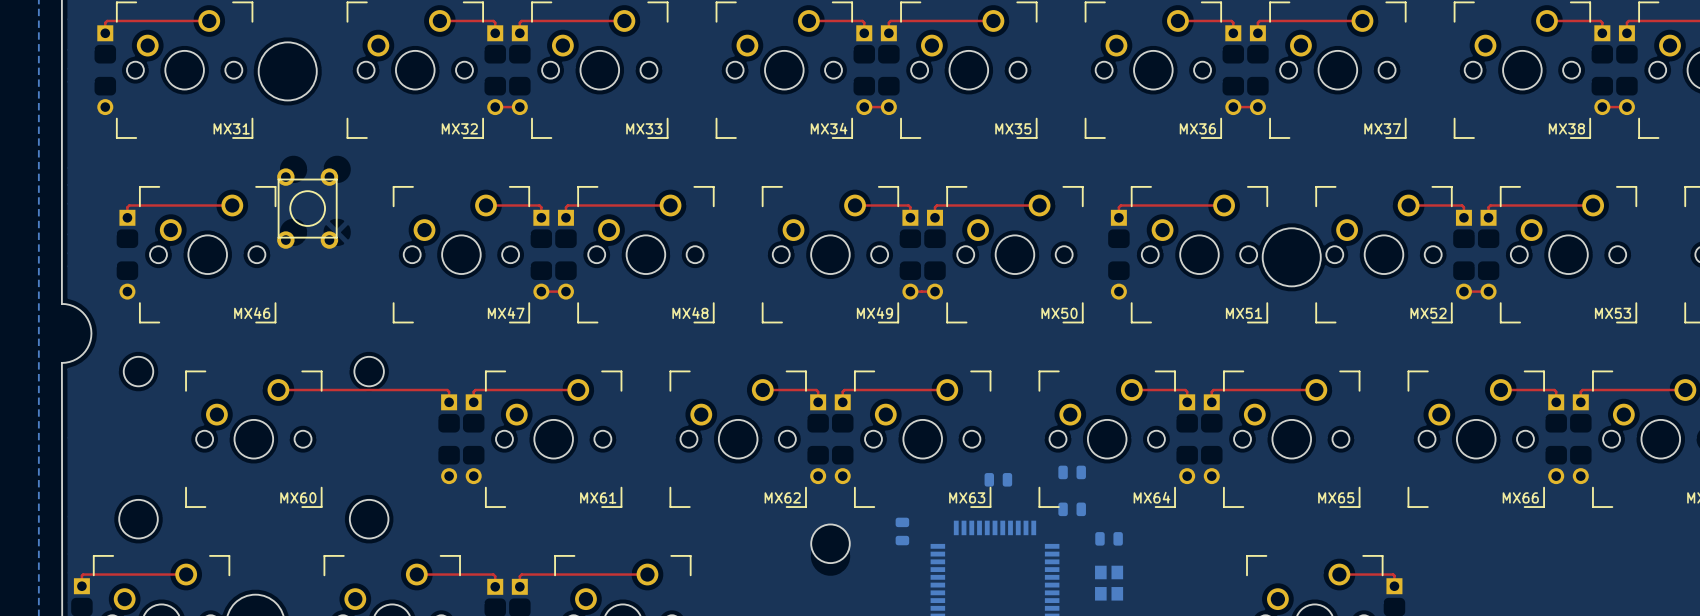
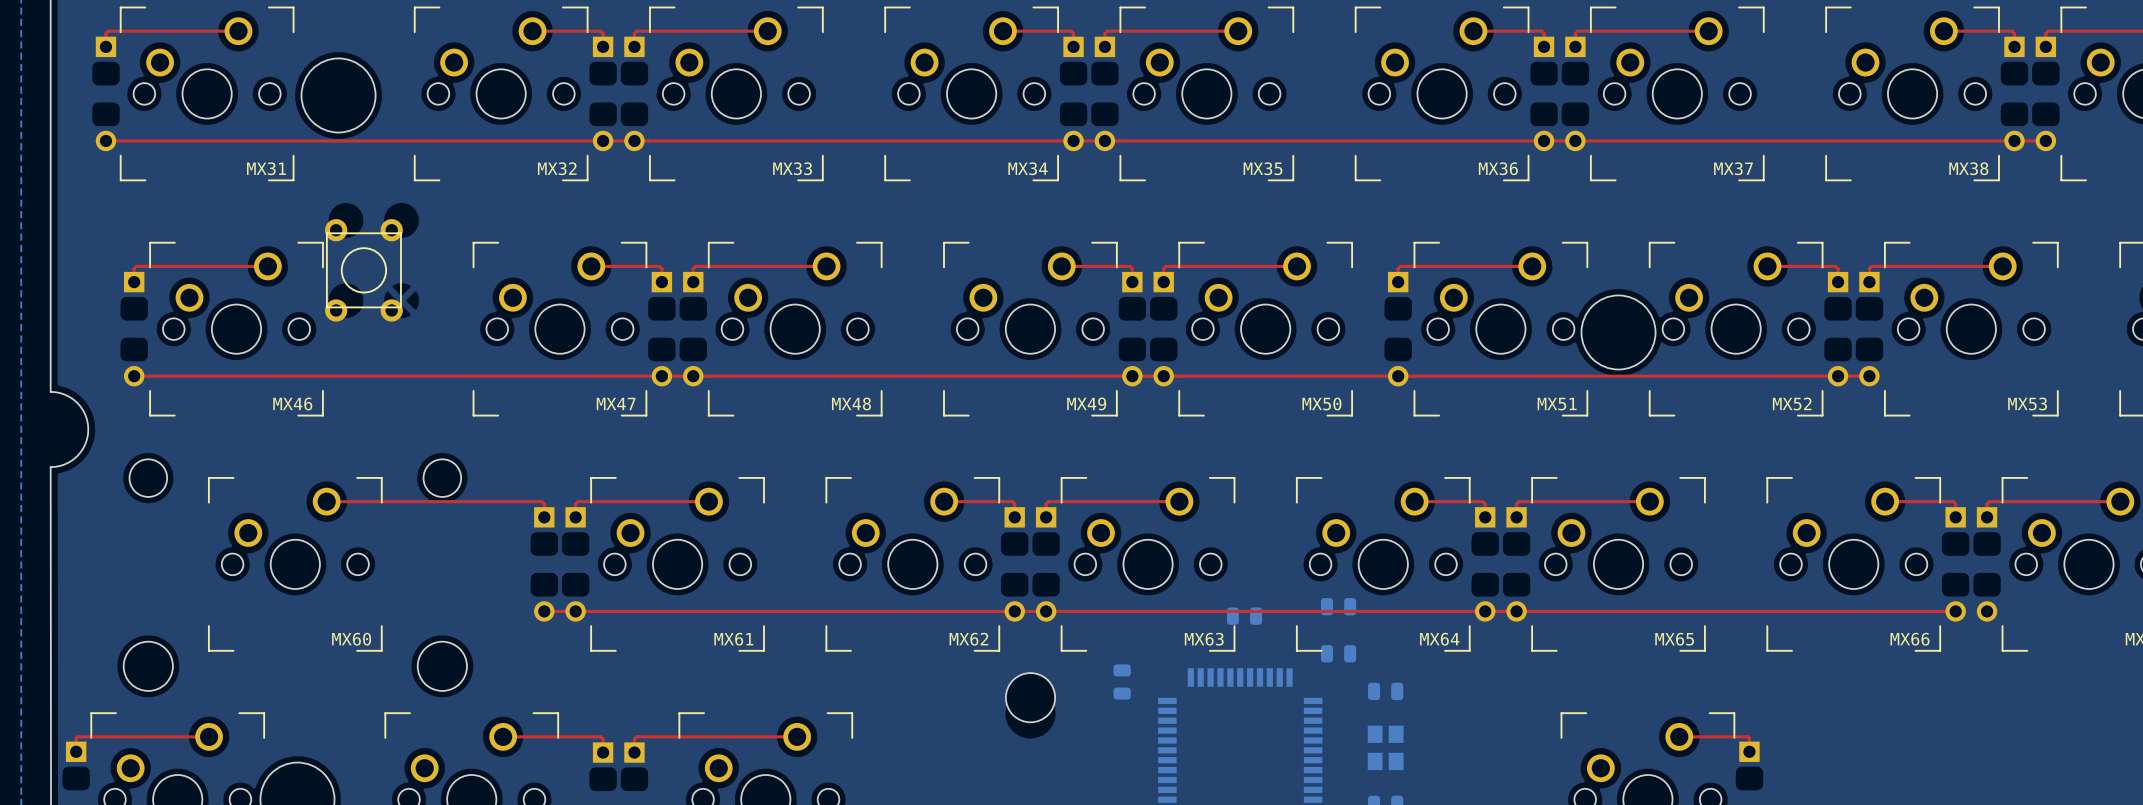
top track: none -> (105, 140) (603, 140)
top track: none -> (634, 140) (1073, 140)
top track: none -> (1104, 140) (1544, 140)
top track: none -> (1575, 140) (2014, 140)
top track: none -> (134, 376) (661, 376)
top track: none -> (693, 376) (1132, 376)
top track: none -> (1163, 376) (1838, 376)
top track: none -> (544, 611) (1955, 611)

